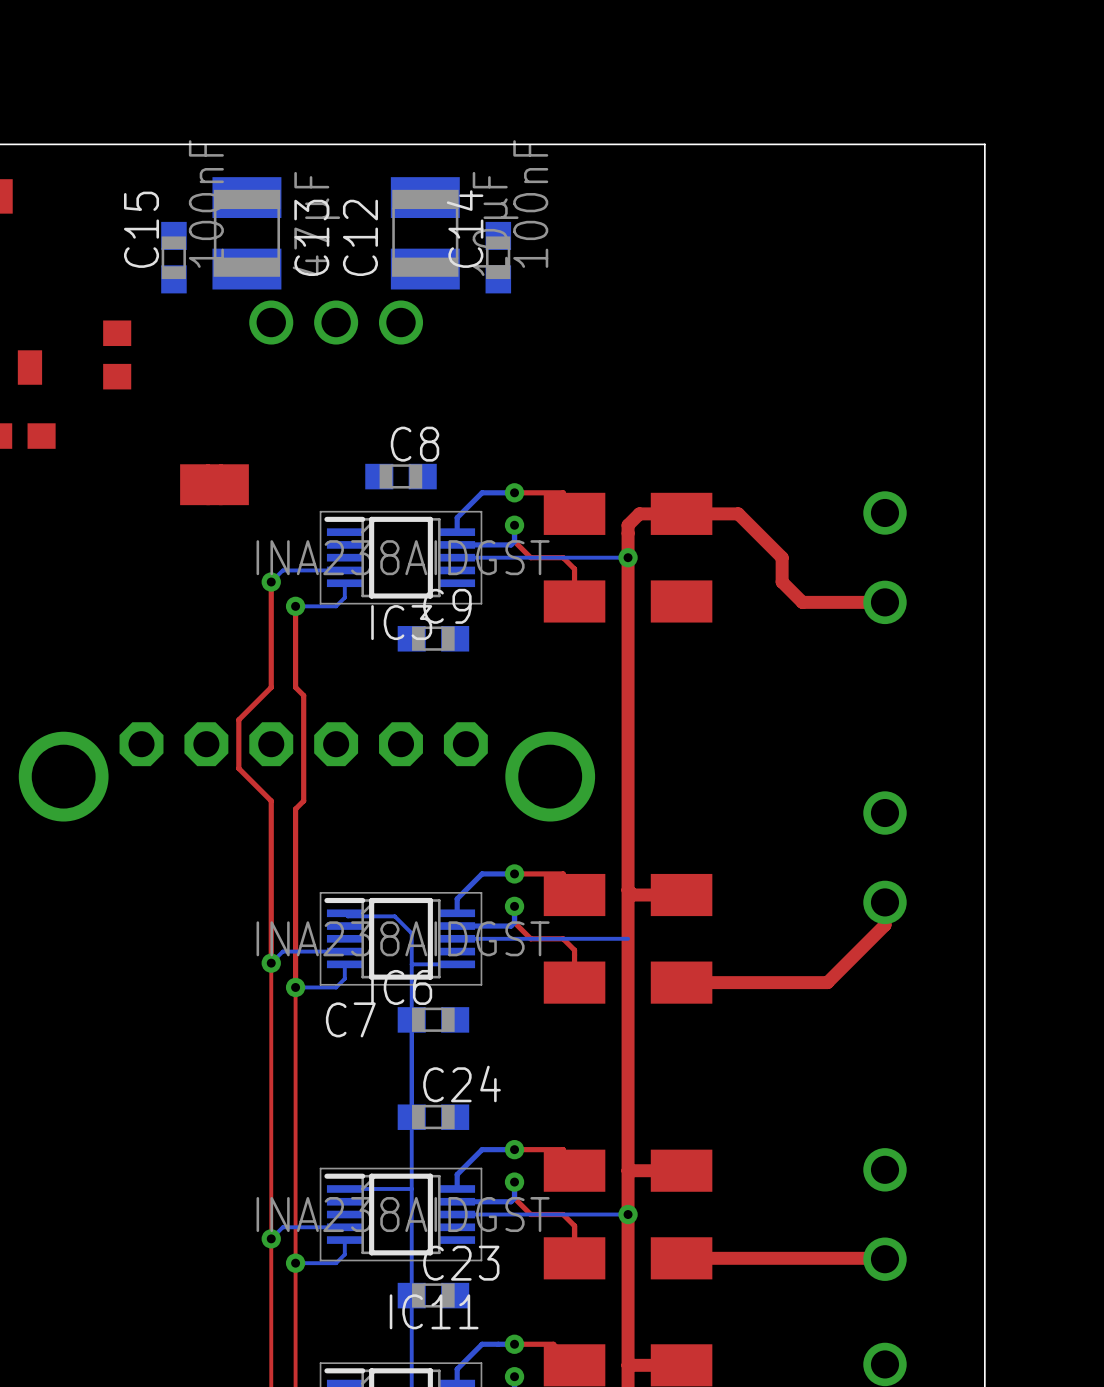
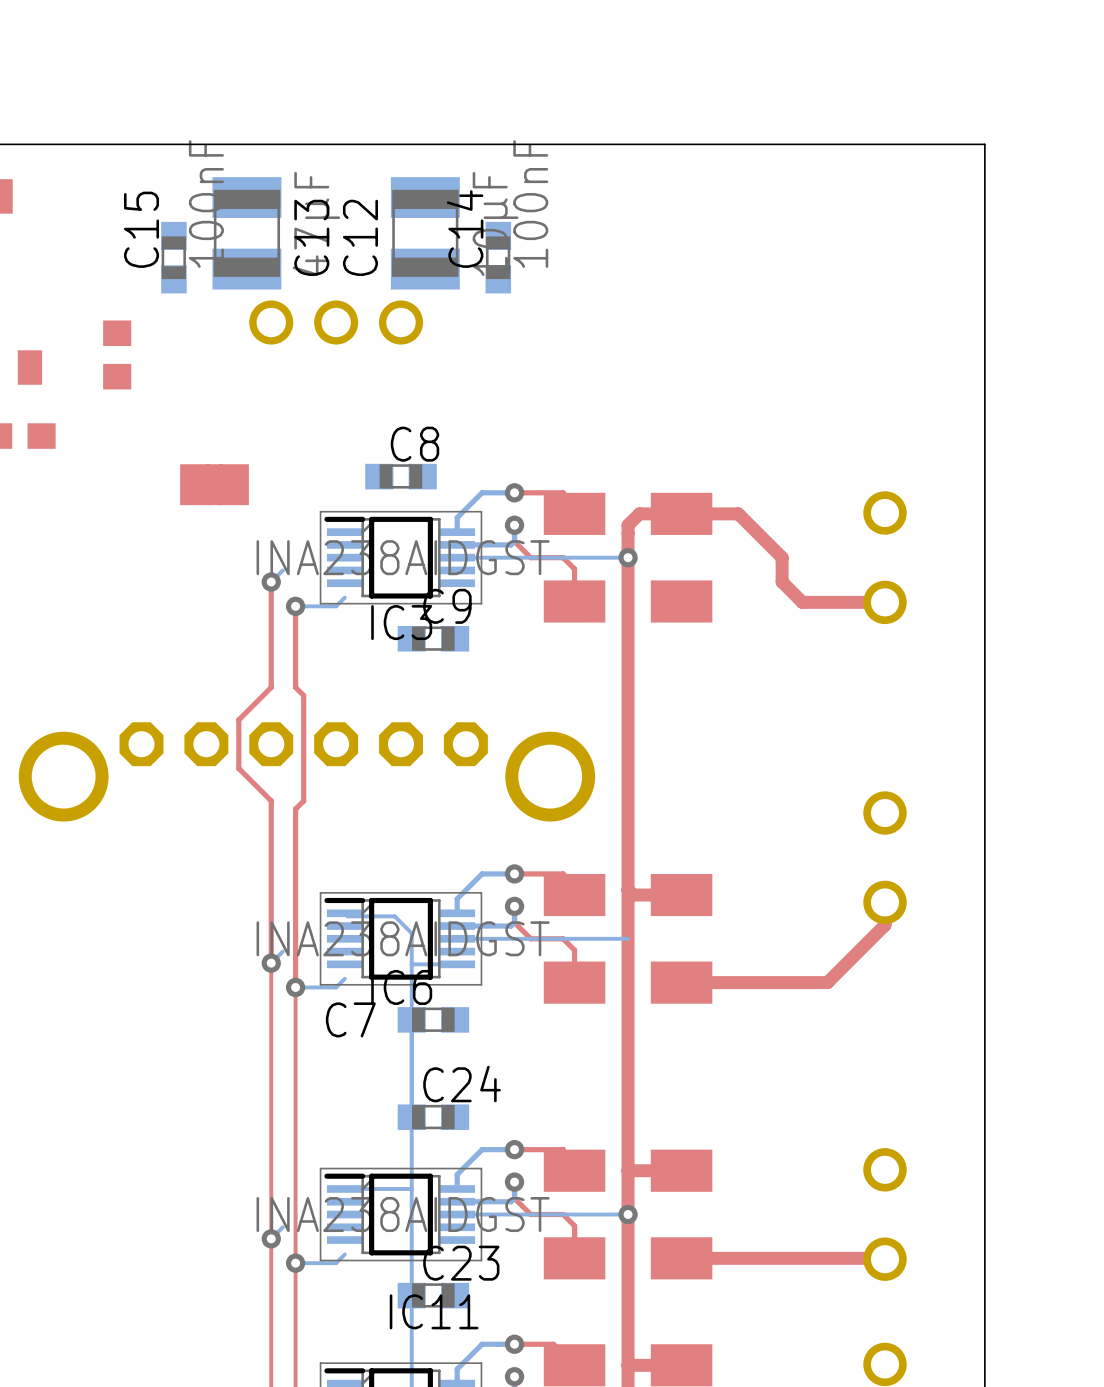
bottom track: (344, 570) (282, 570) -> none
bottom track: (344, 583) (344, 597) -> none
bottom track: (344, 951) (282, 951) -> none
bottom track: (344, 964) (344, 978) -> none
bottom track: (344, 1227) (282, 1227) -> none
bottom track: (344, 1240) (344, 1254) -> none

